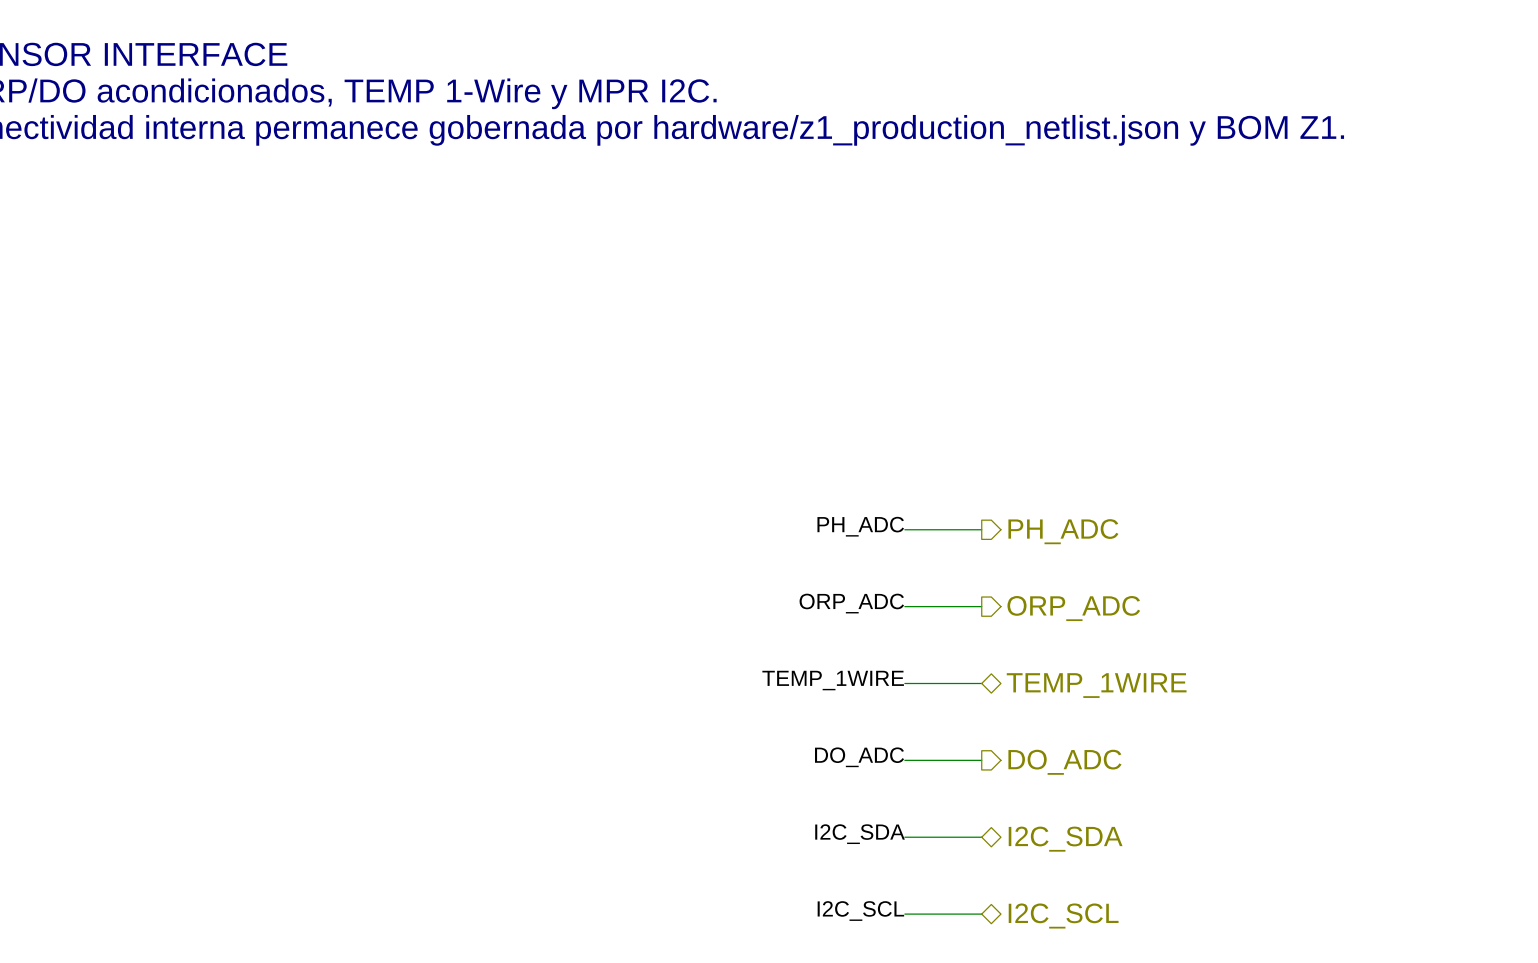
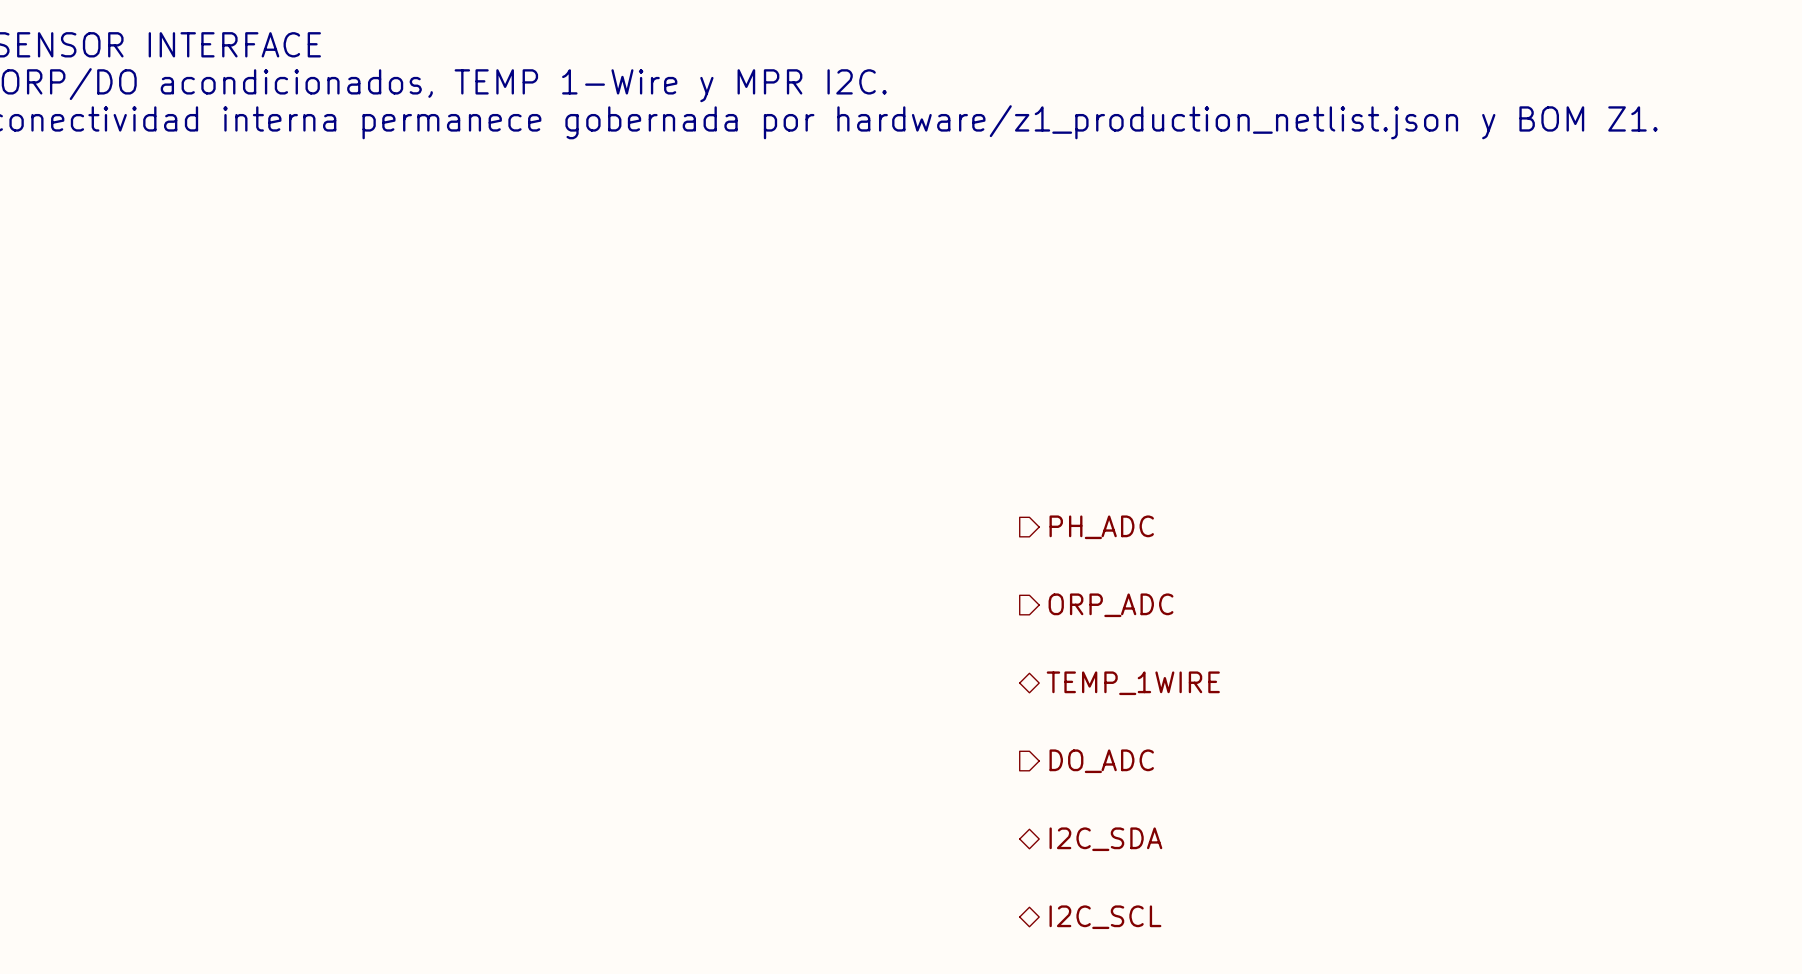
label: PH_ADC (860, 526) -> none
wire: (904, 529) (981, 529) -> none
label: ORP_ADC (851, 603) -> none
wire: (904, 606) (981, 606) -> none
label: TEMP_1WIRE (833, 680) -> none
wire: (904, 683) (981, 683) -> none
label: DO_ADC (859, 757) -> none
wire: (904, 760) (981, 760) -> none
label: I2C_SDA (860, 834) -> none
wire: (904, 837) (981, 837) -> none
label: I2C_SCL (860, 911) -> none
wire: (904, 914) (981, 914) -> none

